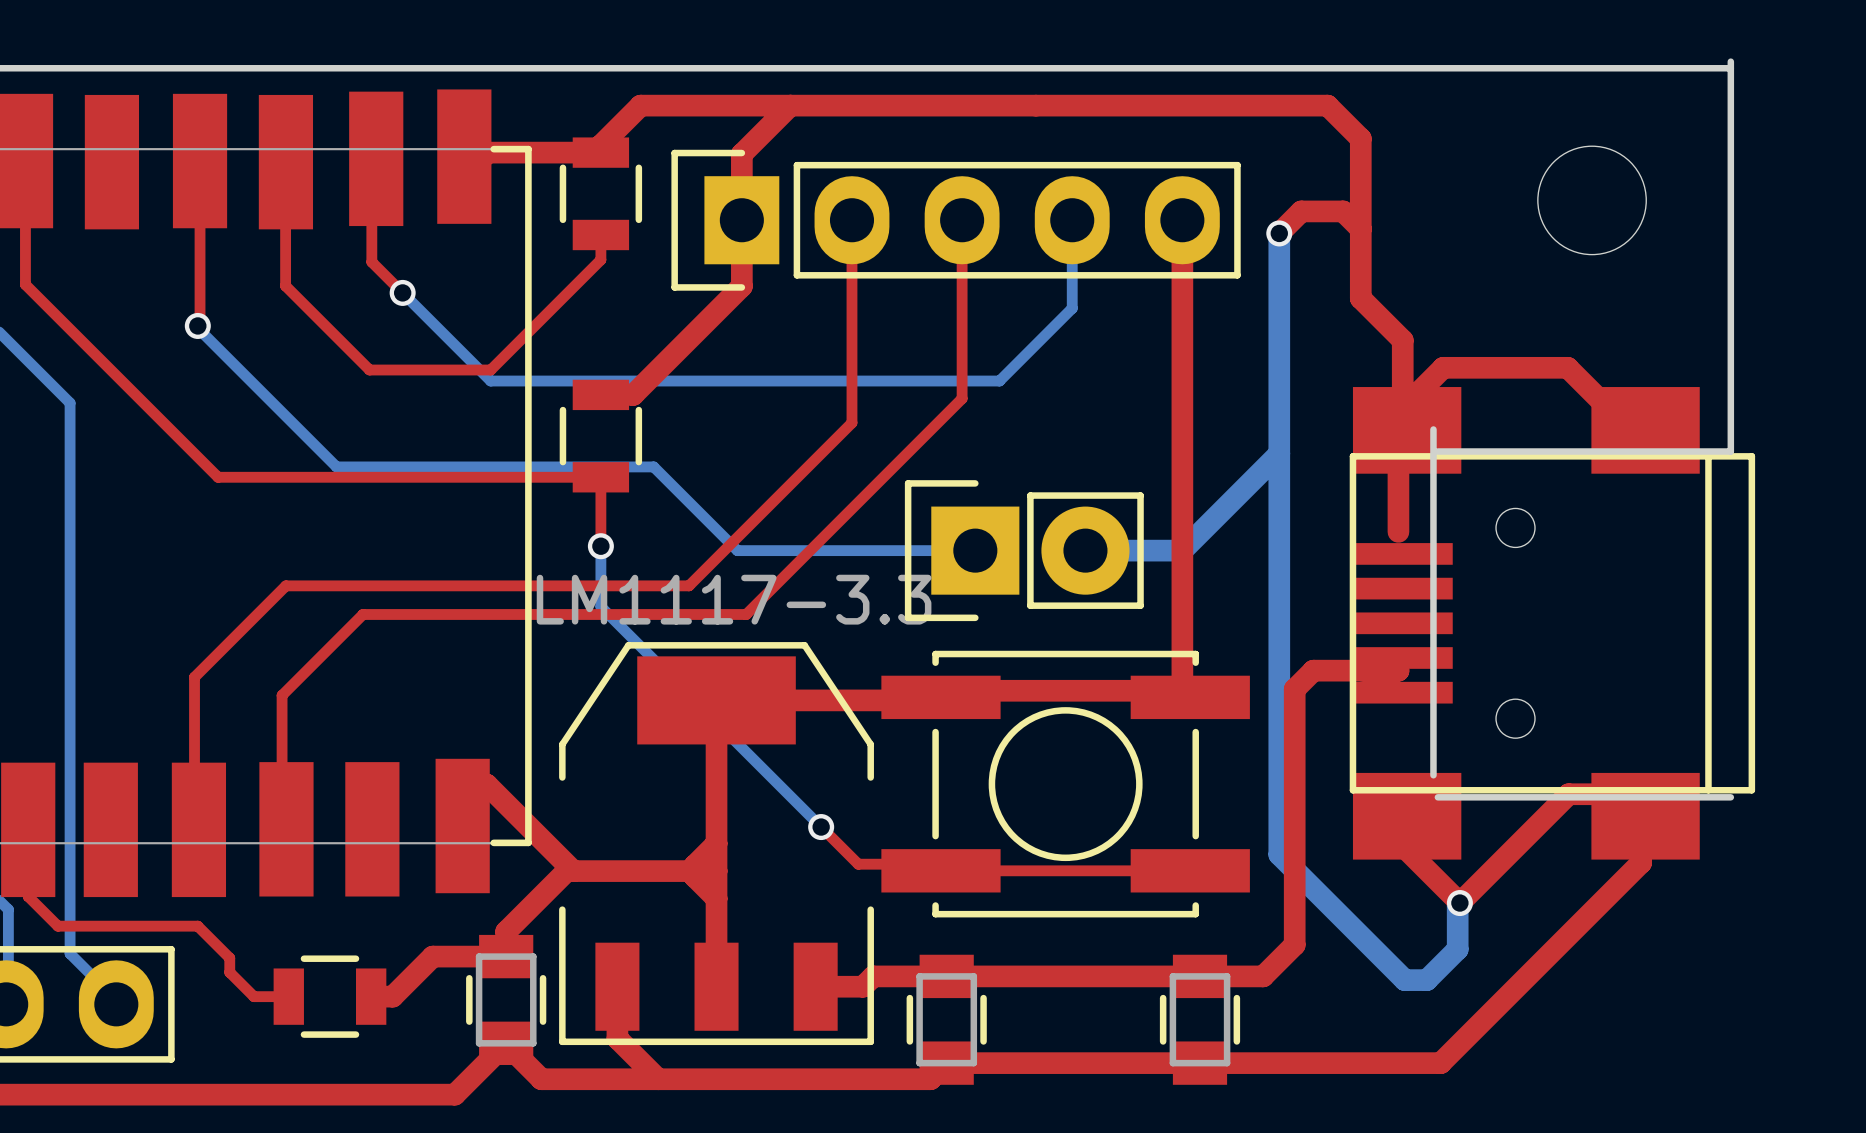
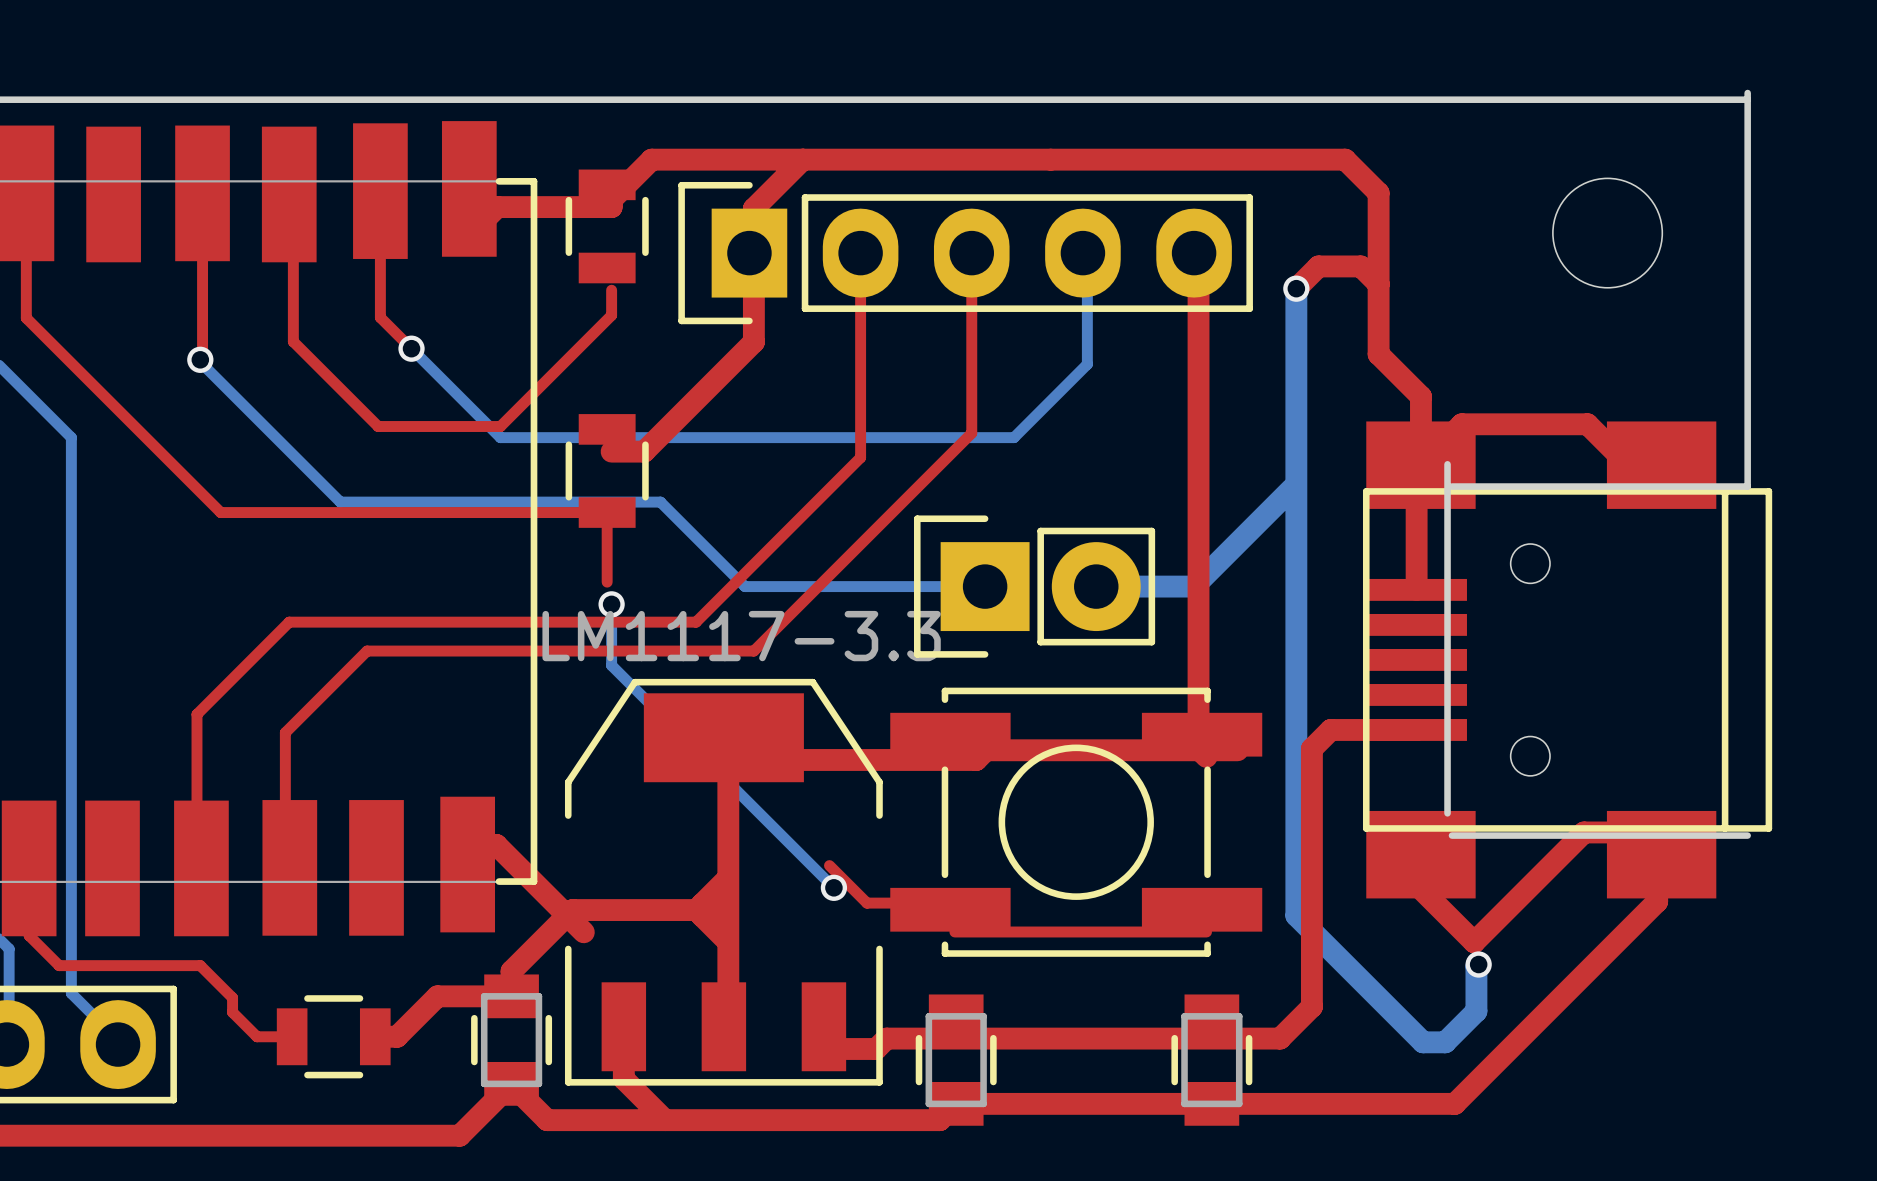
top track: (790, 105) (741, 154) (741, 286) (633, 394) (600, 394) -> (802, 159) (753, 208) (753, 342) (644, 451) (611, 451)
top track: (371, 167) (371, 262) (402, 292) -> (380, 221) (380, 317) (411, 348)
top track: (464, 175) (487, 152) (600, 152) (600, 145) (640, 105) (1327, 105) (1360, 138) (1360, 298) (1402, 340) (1402, 408) -> (473, 230) (497, 207) (611, 207) (611, 199) (651, 159) (1345, 159) (1378, 193) (1378, 354) (1420, 396) (1420, 465)
top track: (285, 181) (285, 285) (369, 370) (490, 370) (600, 259) (600, 234) -> (293, 236) (293, 341) (378, 426) (500, 426) (611, 315) (611, 290)
bottom track: (1072, 220) (1072, 308) (999, 381) (490, 381) (402, 292) -> (1087, 275) (1087, 364) (1014, 437) (500, 437) (411, 348)
top track: (1182, 220) (1182, 689) (1190, 697) -> (1198, 275) (1198, 748) (1206, 756)
top track: (1360, 229) (1343, 211) (1301, 211) (1279, 233) -> (1378, 284) (1360, 266) (1318, 266) (1296, 288)
bottom track: (1279, 233) (1279, 854) (1404, 980) (1426, 980) (1457, 949) (1457, 905) (1459, 903) -> (1296, 288) (1296, 915) (1423, 1042) (1445, 1042) (1476, 1011) (1476, 966) (1478, 964)
via position: (1279, 233) -> (1296, 288)
via position: (402, 292) -> (411, 348)
top track: (1641, 408) (1608, 408) (1567, 367) (1443, 367) (1398, 412) (1398, 531) -> (1661, 465) (1628, 465) (1587, 424) (1461, 424) (1416, 469) (1416, 589)
bottom track: (600, 546) (600, 606) (821, 827) -> (611, 604) (611, 665) (833, 887)
via position: (600, 546) -> (611, 604)
top track: (1398, 670) (1313, 670) (1294, 689) (1294, 944) (1263, 976) (873, 976) (863, 986) (815, 986) -> (1416, 729) (1330, 729) (1311, 748) (1311, 1006) (1280, 1038) (886, 1038) (876, 1049) (828, 1049)
top track: (1221, 690) (971, 690) (962, 700) (716, 700) (716, 986) -> (1237, 750) (986, 750) (976, 759) (728, 759) (728, 1049)
top track: (462, 784) (486, 784) (573, 871) -> (472, 845) (496, 845) (583, 932)
via position: (821, 827) -> (833, 887)
top track: (940, 870) (1190, 870) -> (954, 931) (1206, 931)
via position: (1459, 903) -> (1478, 964)

